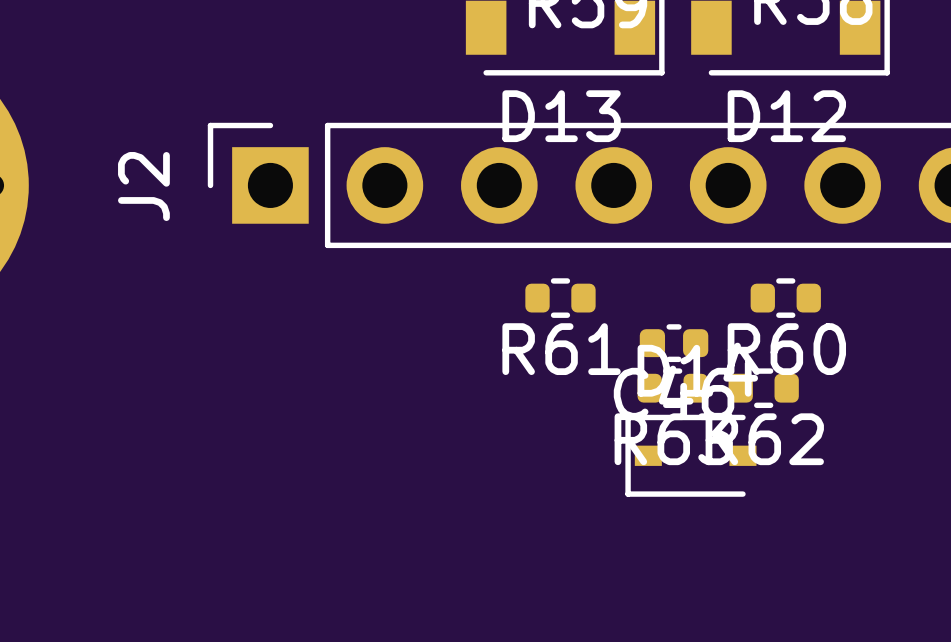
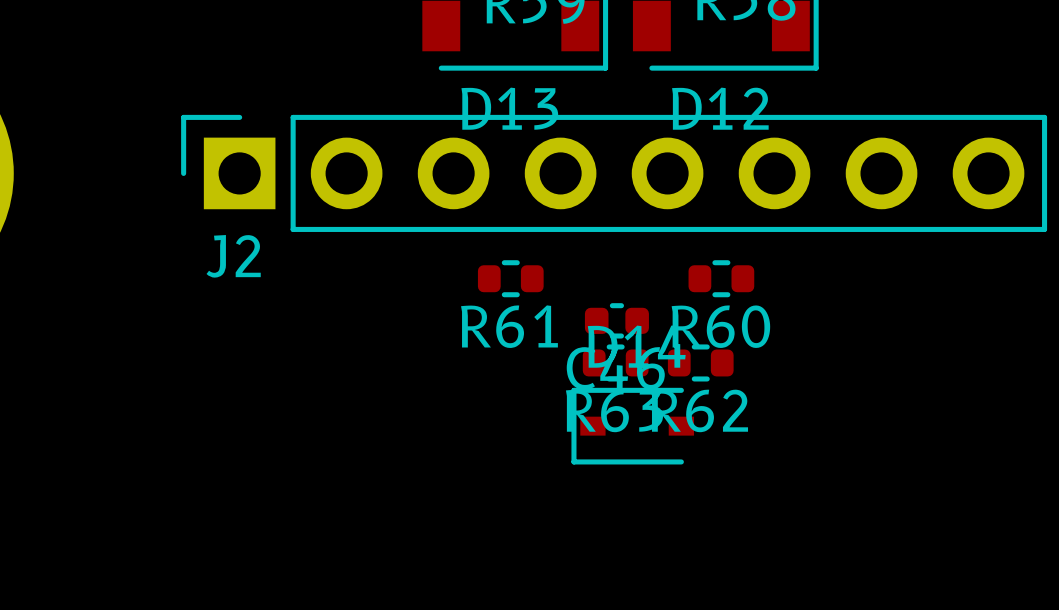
J2 name rotation: 0° (143, 186) -> 90° clockwise (233, 256)
J2 name position: J2 (143, 186) -> J2 (233, 256)

